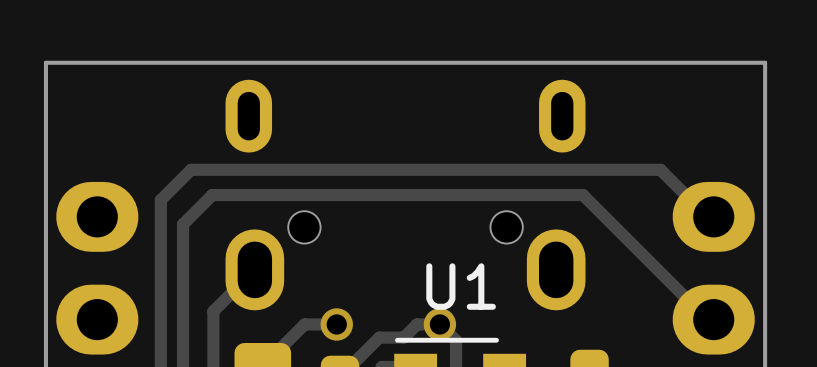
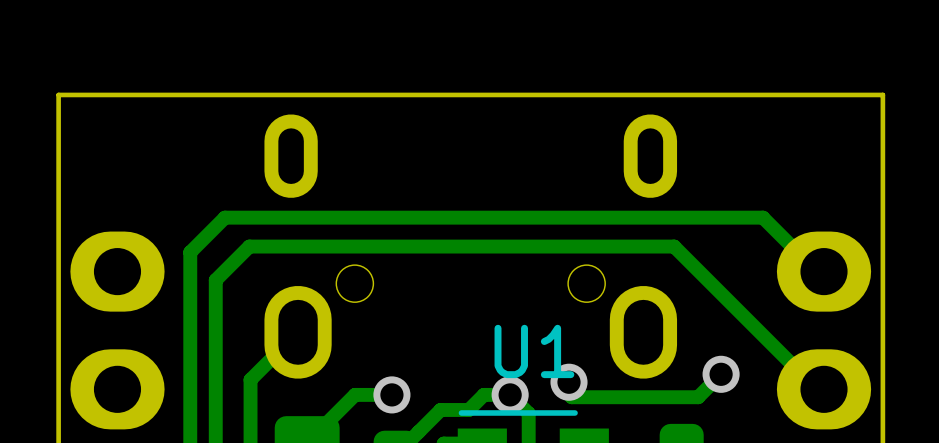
track: none -> (721, 374) (698, 397) (571, 397) (567, 392)
via: none -> (721, 374)
via: none -> (569, 382)

